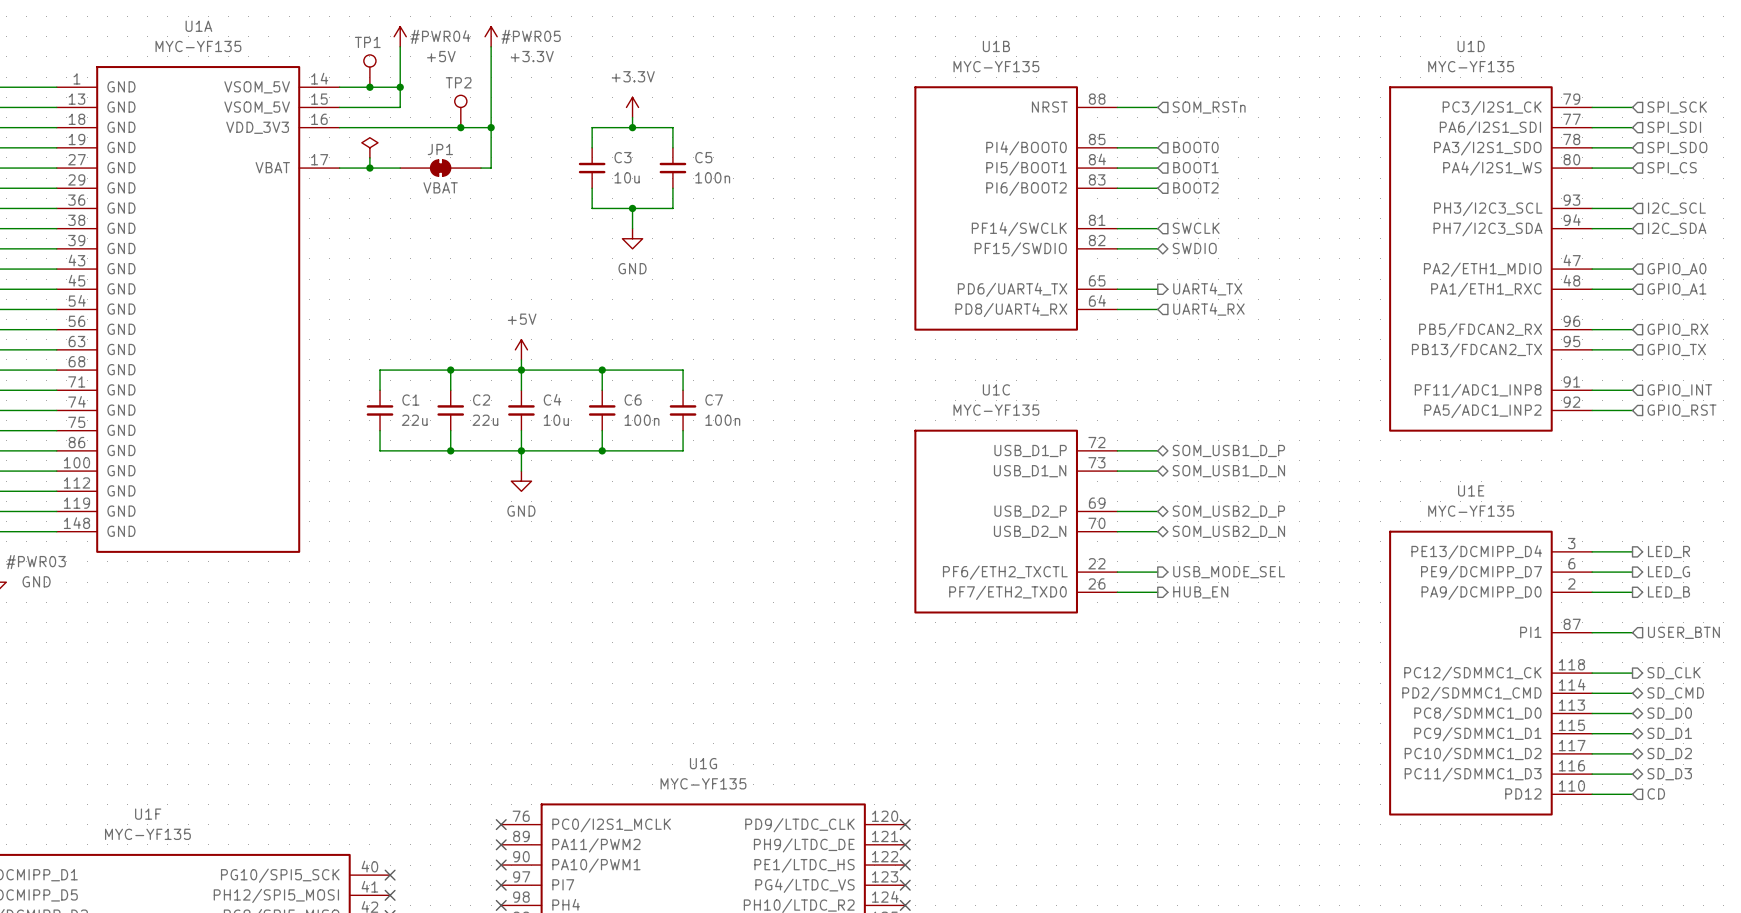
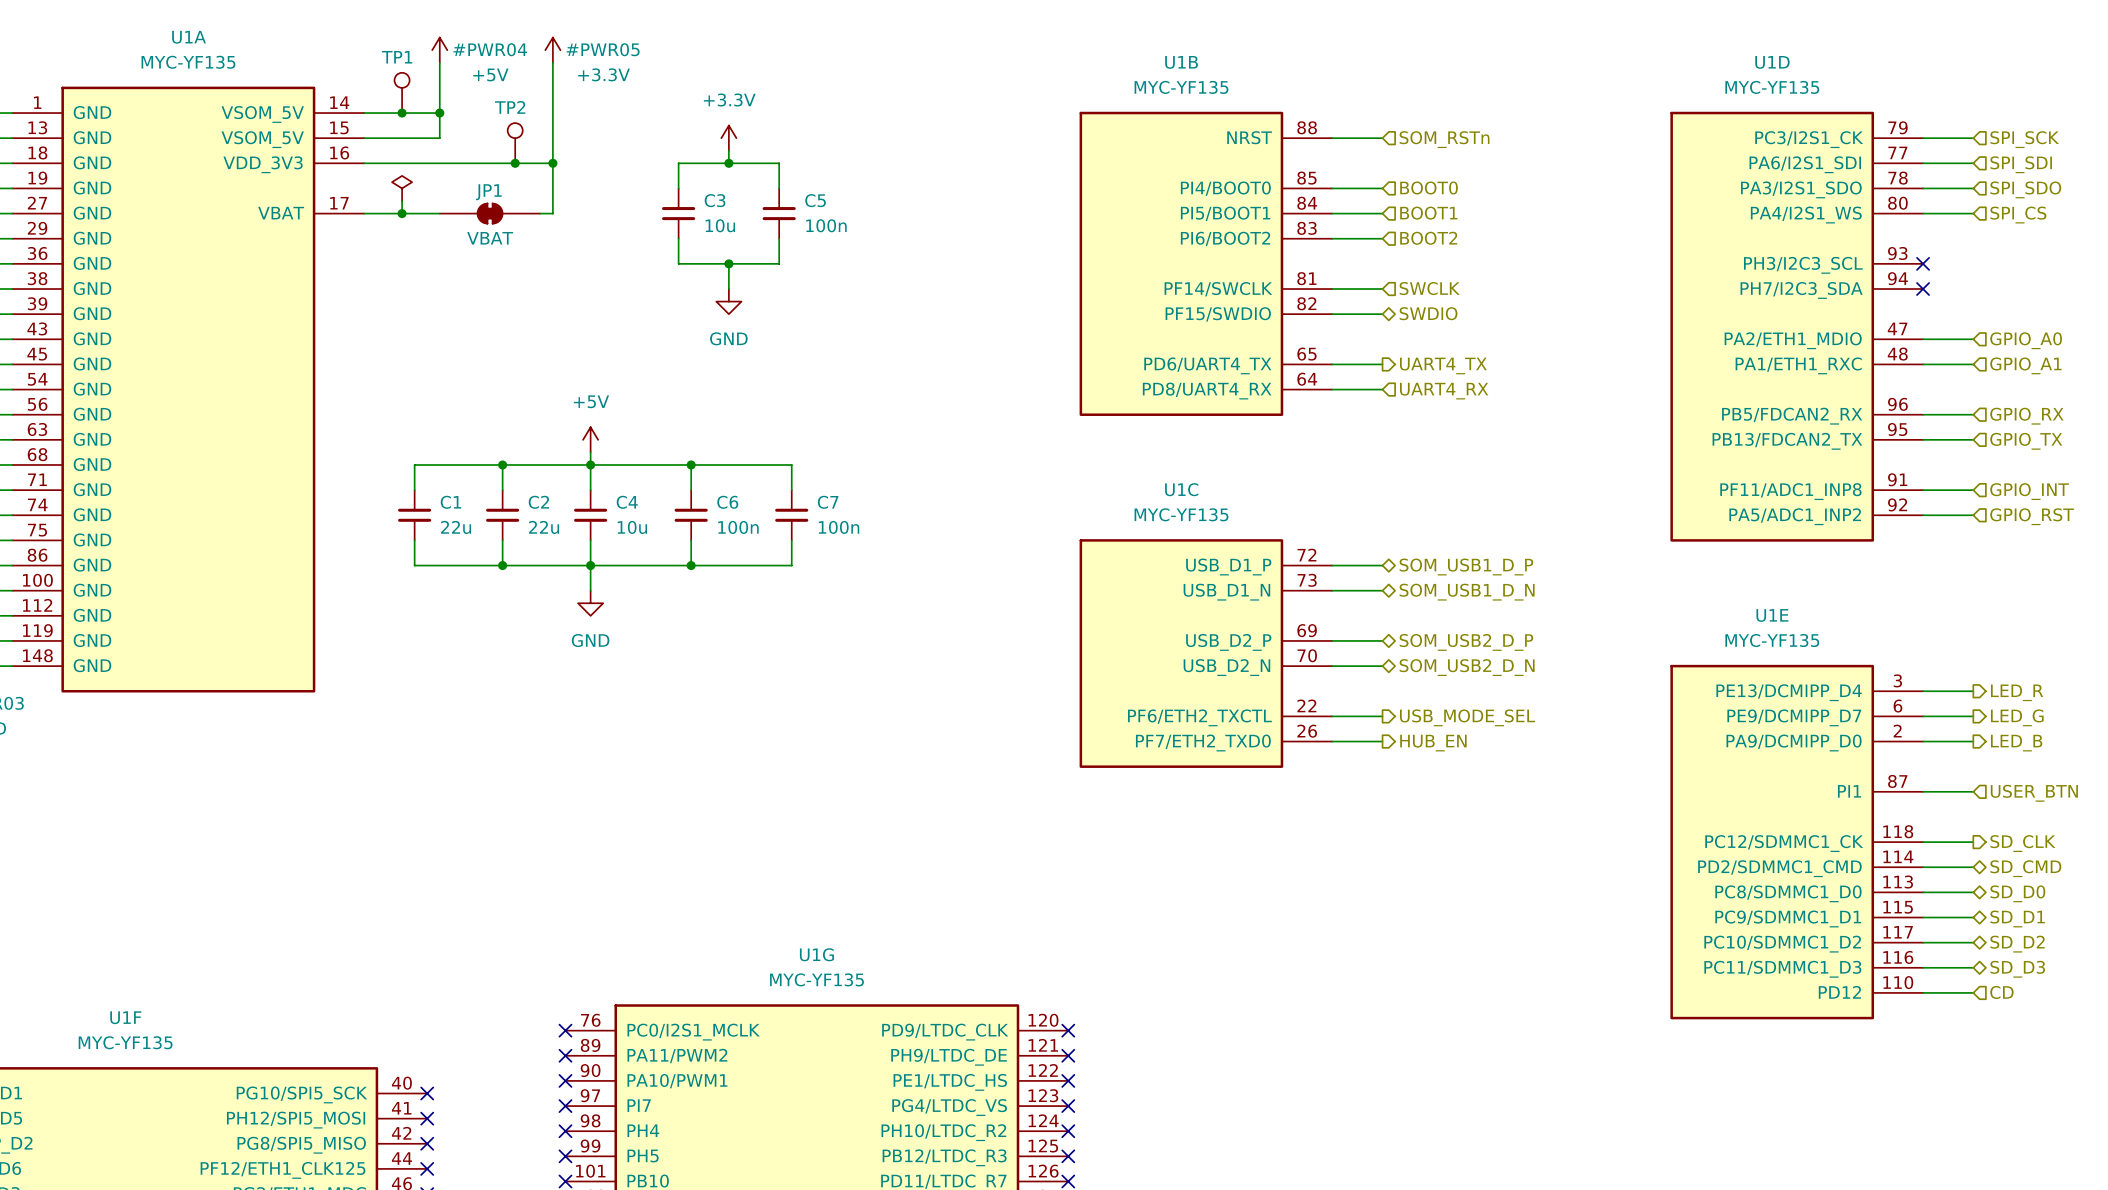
wire: (1592, 208) (1632, 208) -> none
no-connect mark: none -> (1923, 263)
hierarchical label: I2C_SCL (1676, 208) -> none
wire: (1592, 228) (1632, 228) -> none
no-connect mark: none -> (1923, 289)
hierarchical label: I2C_SDA (1677, 228) -> none

